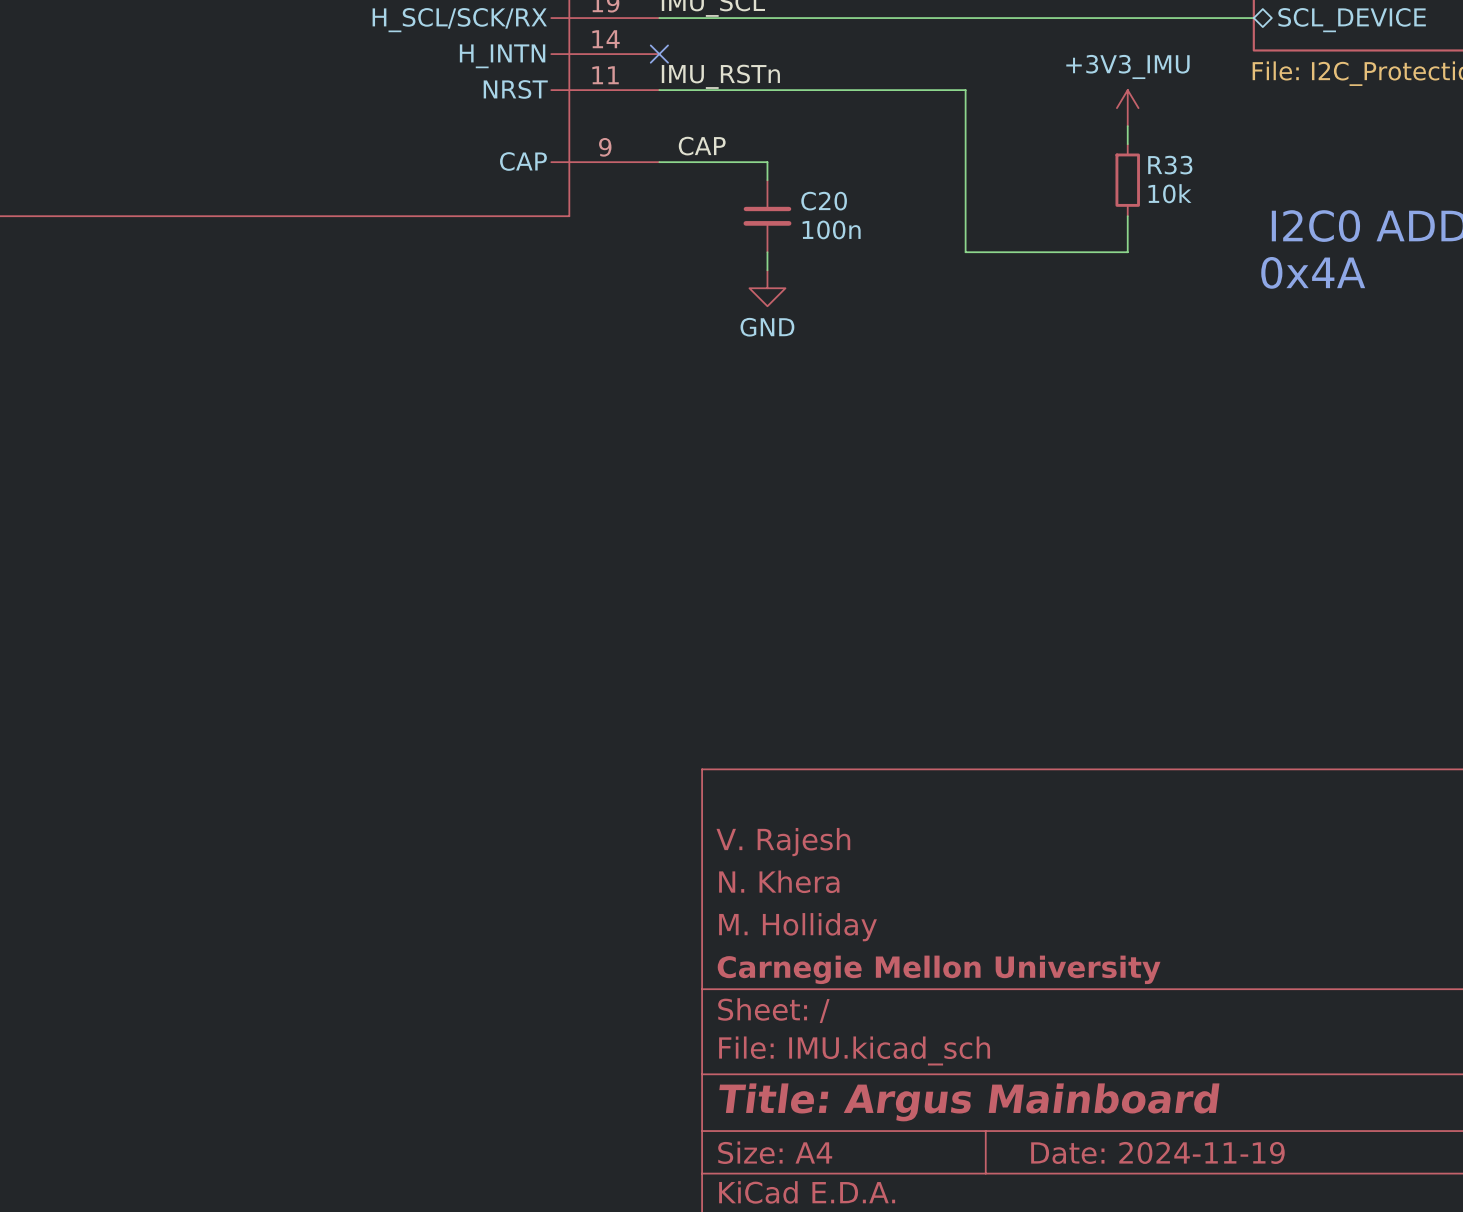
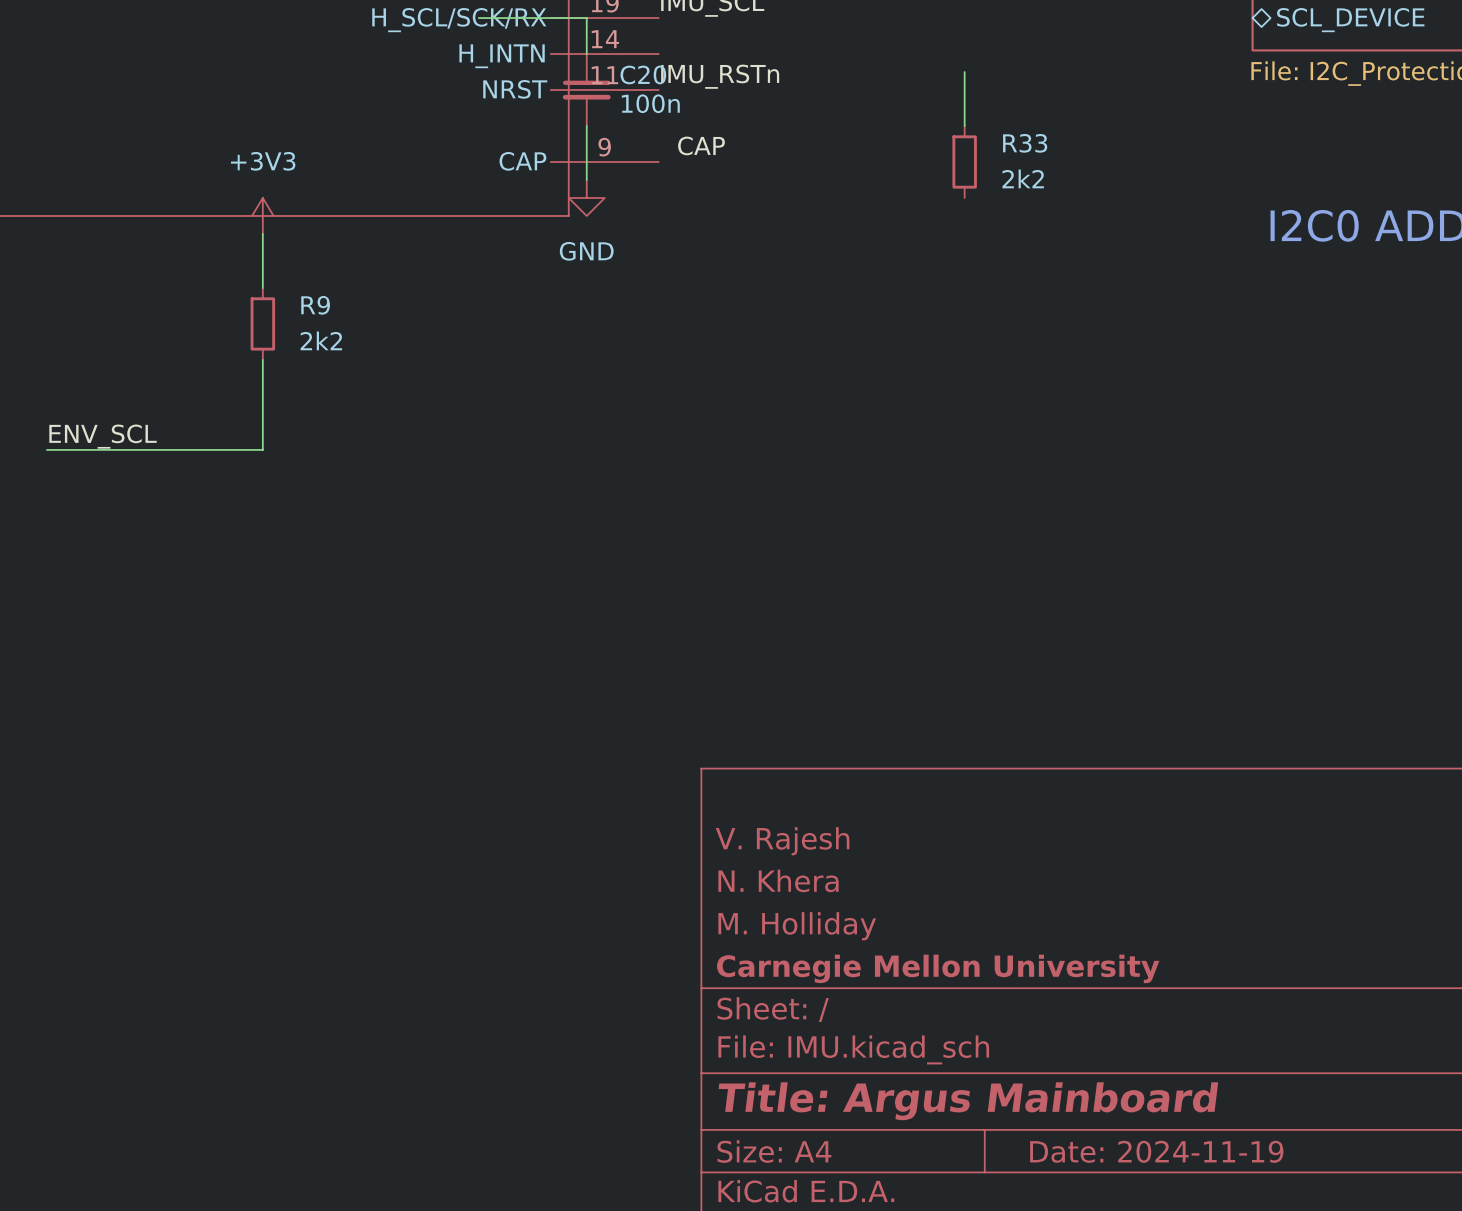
wire: none -> (478, 18) (586, 18) (586, 54)
wire: (659, 18) (1253, 18) -> none
no-connect mark: (659, 54) -> none
wire: (659, 90) (965, 90) -> (964, 72) (964, 90)
power symbol: +3V3_IMU (1127, 108) -> none
wire: none -> (586, 126) (586, 179)
wire: (965, 126) (965, 252) (1127, 252) (1127, 216) -> none
wire: (1127, 126) (1127, 144) -> none
wire: (659, 162) (767, 162) (767, 180) -> none
R33 name position: R33 (1170, 165) -> R33 (1025, 143)
R33 position: (1127, 180) -> (964, 162)
R33 value: 10k (1169, 193) -> 2k2 (1023, 178)
power symbol: none -> +3V3 (262, 215)
C20 position: (767, 216) -> (586, 90)
wire: none -> (262, 233) (262, 287)
wire: (767, 252) (767, 270) -> none
text: 0x4A (1313, 272) -> none
power symbol position: GND (767, 288) -> GND (586, 197)
R9: none -> 2k2 (262, 323)
power symbol text position: GND (767, 327) -> GND (586, 251)
wire: none -> (262, 359) (262, 449) (46, 449)
label: none -> ENV_SCL (103, 436)

